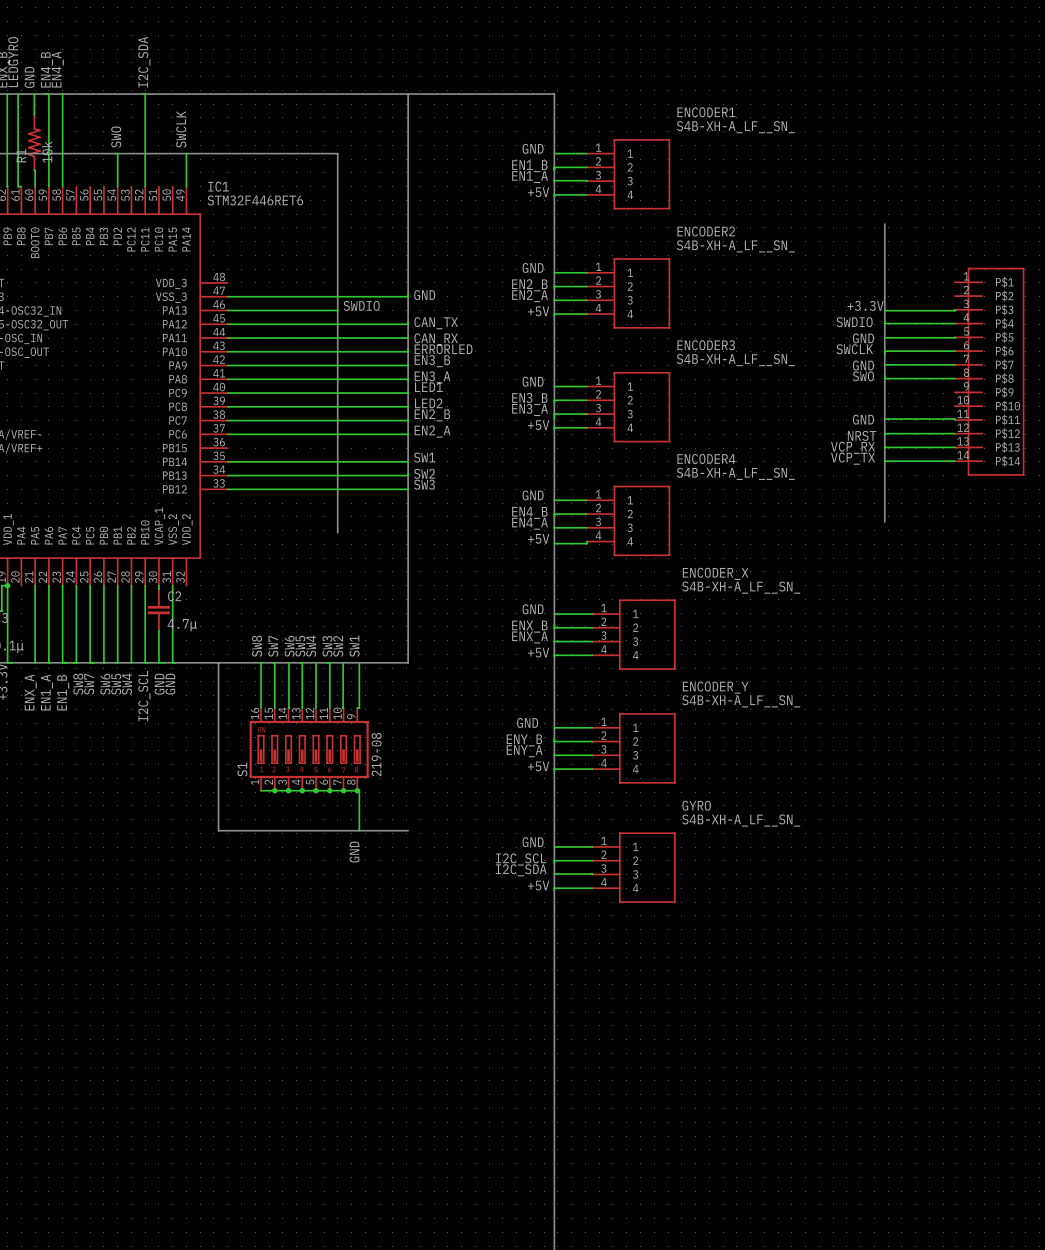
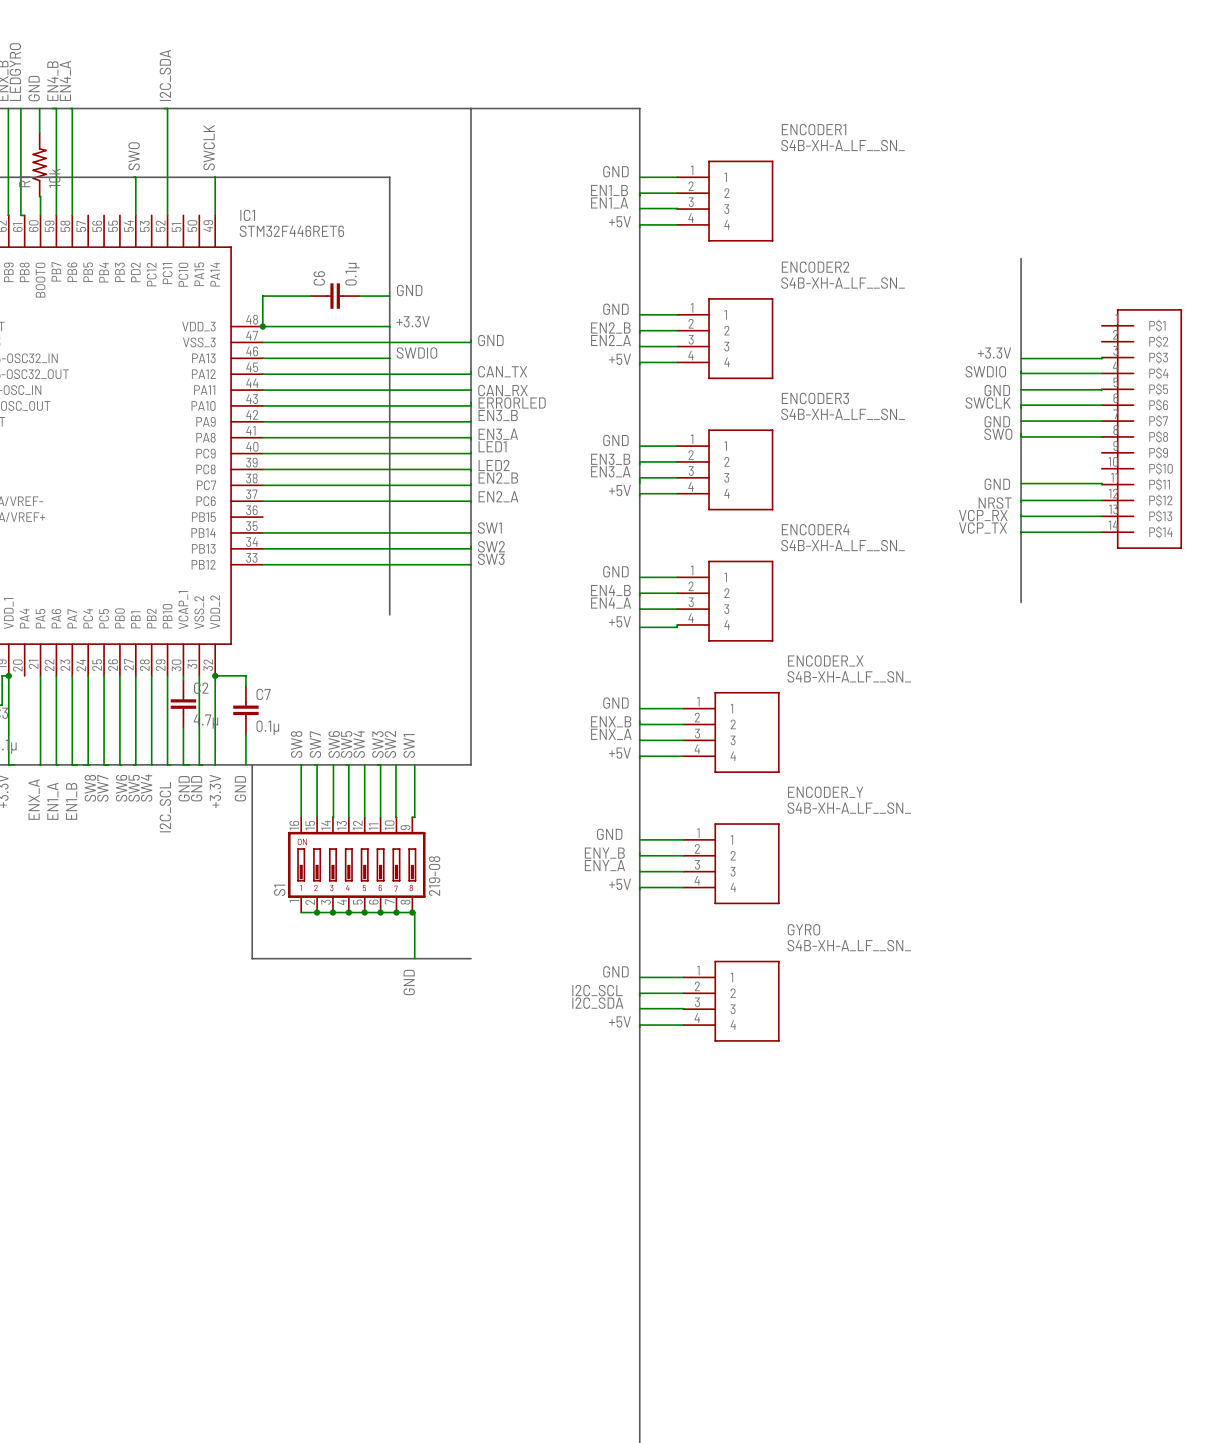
label: none -> GND (409, 290)
wire: none -> (311, 296) (262, 296) (262, 326) (389, 327)
C6: none -> 0.1μ (335, 296)
wire: none -> (358, 296) (389, 296)
label: none -> +3.3V (413, 321)
junction: none -> (262, 326)
junction: none -> (215, 675)
wire: none -> (245, 686) (245, 675) (215, 675) (214, 764)
C7: none -> 0.1μ (245, 710)
wire: none -> (245, 734) (245, 764)
label: none -> +3.3V (215, 791)
label: none -> GND (240, 788)

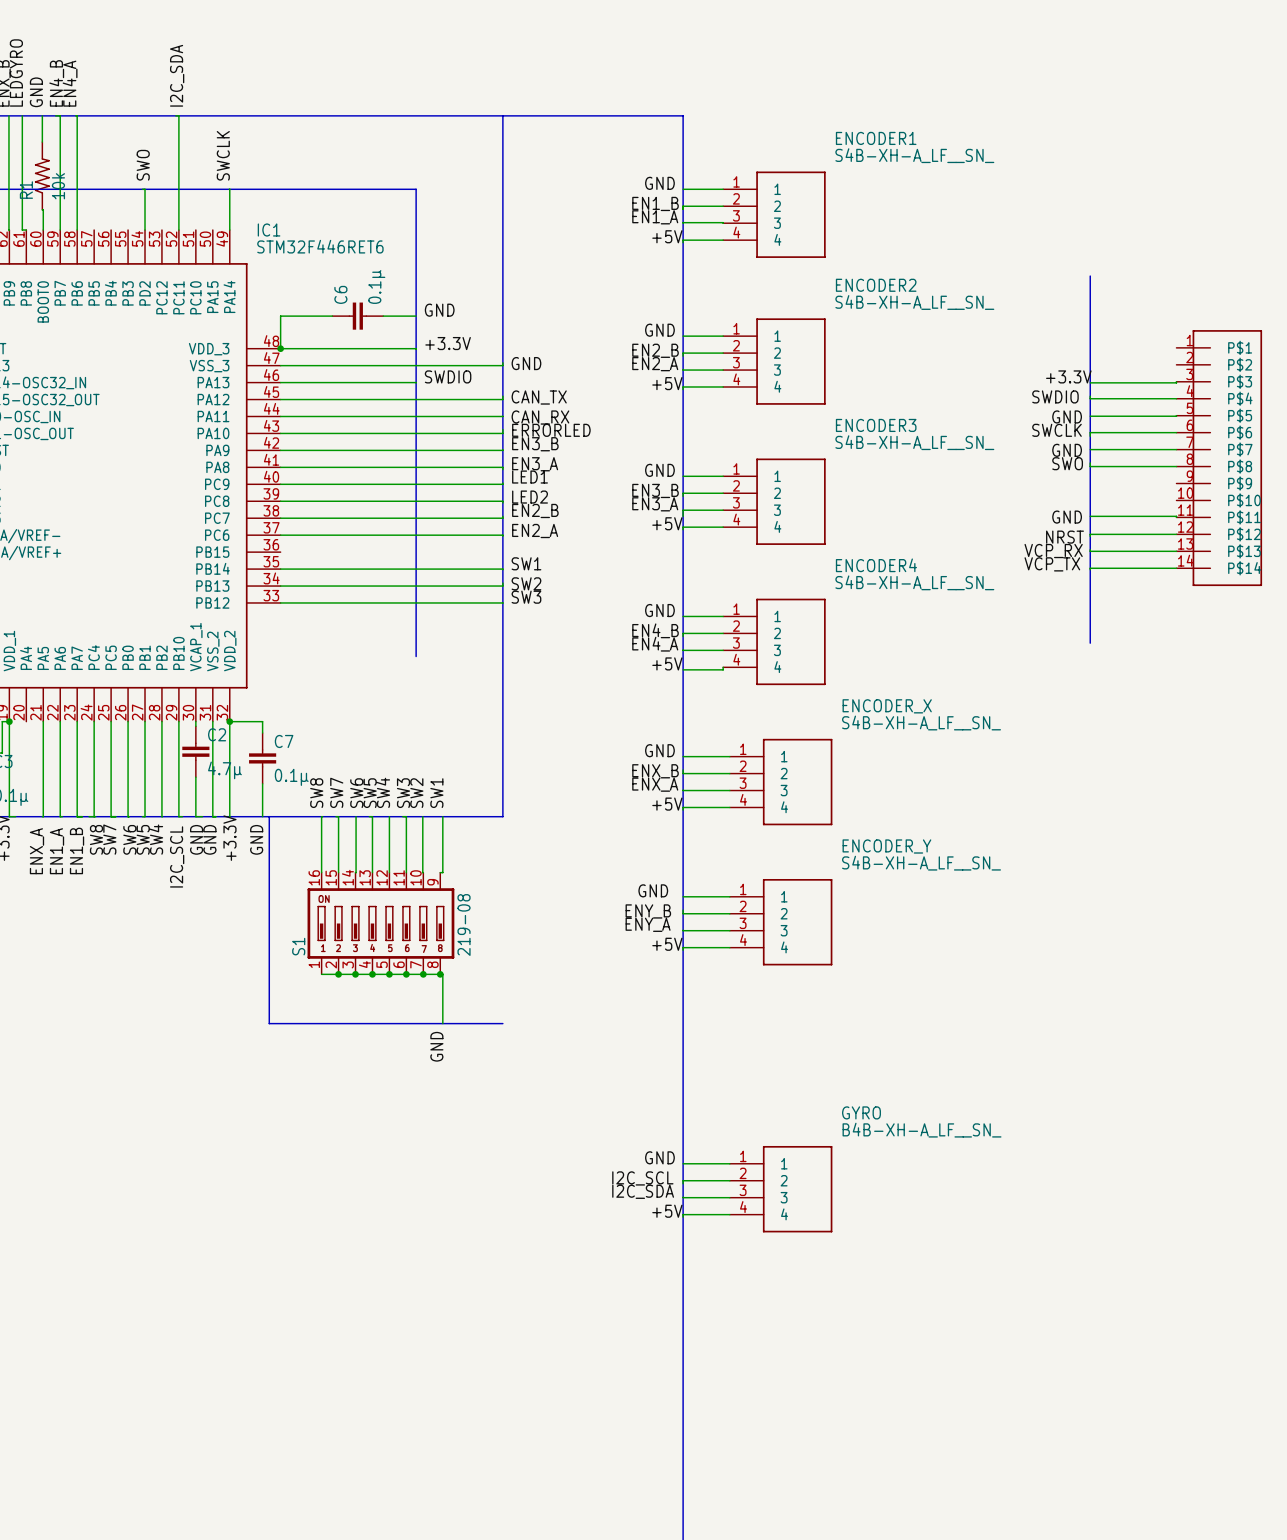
label position: GND (615, 971) -> GND (659, 1157)
wire: (639, 977) (683, 977) -> (683, 1163) (729, 1163)
label position: I2C_SCL (597, 990) -> I2C_SCL (642, 1178)
wire: (683, 993) (639, 993) (639, 996) -> (729, 1180) (683, 1180) (683, 1183)
GYRO: S4B-XH-A_LF__SN_ (731, 1001) -> none
label position: I2C_SDA (597, 1003) -> I2C_SDA (643, 1191)
wire: (639, 1008) (683, 1009) -> none
label position: +5V (620, 1021) -> +5V (667, 1211)
wire: (683, 1025) (639, 1025) (639, 1027) -> (729, 1214) (683, 1214) (683, 1217)
GYRO: none -> B4B-XH-A_LF__SN_ (781, 1189)
wire: none -> (683, 1197) (729, 1197)

